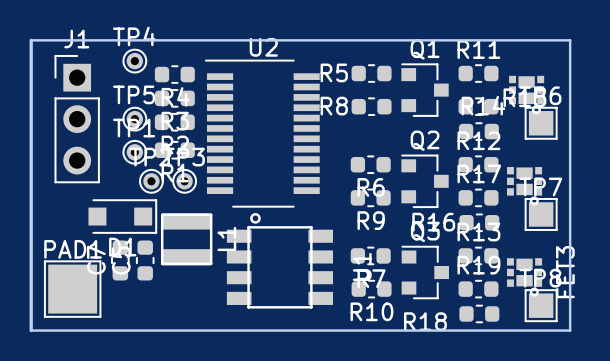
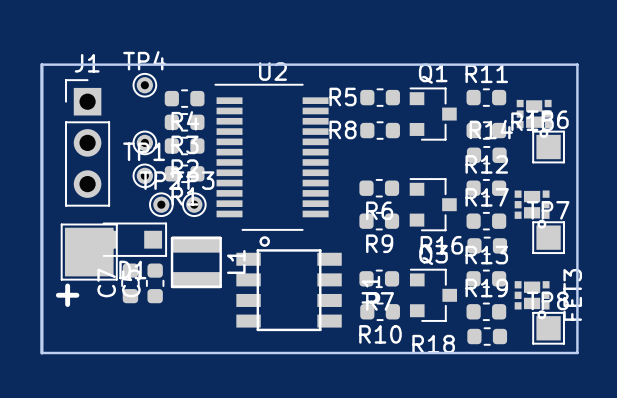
TP5 name: TP5 (134, 94) -> none
Q2 name: Q2 (425, 140) -> none
part: none -> (89, 252)
text: none -> + (67, 295)
PAD1: (72, 289) -> none

